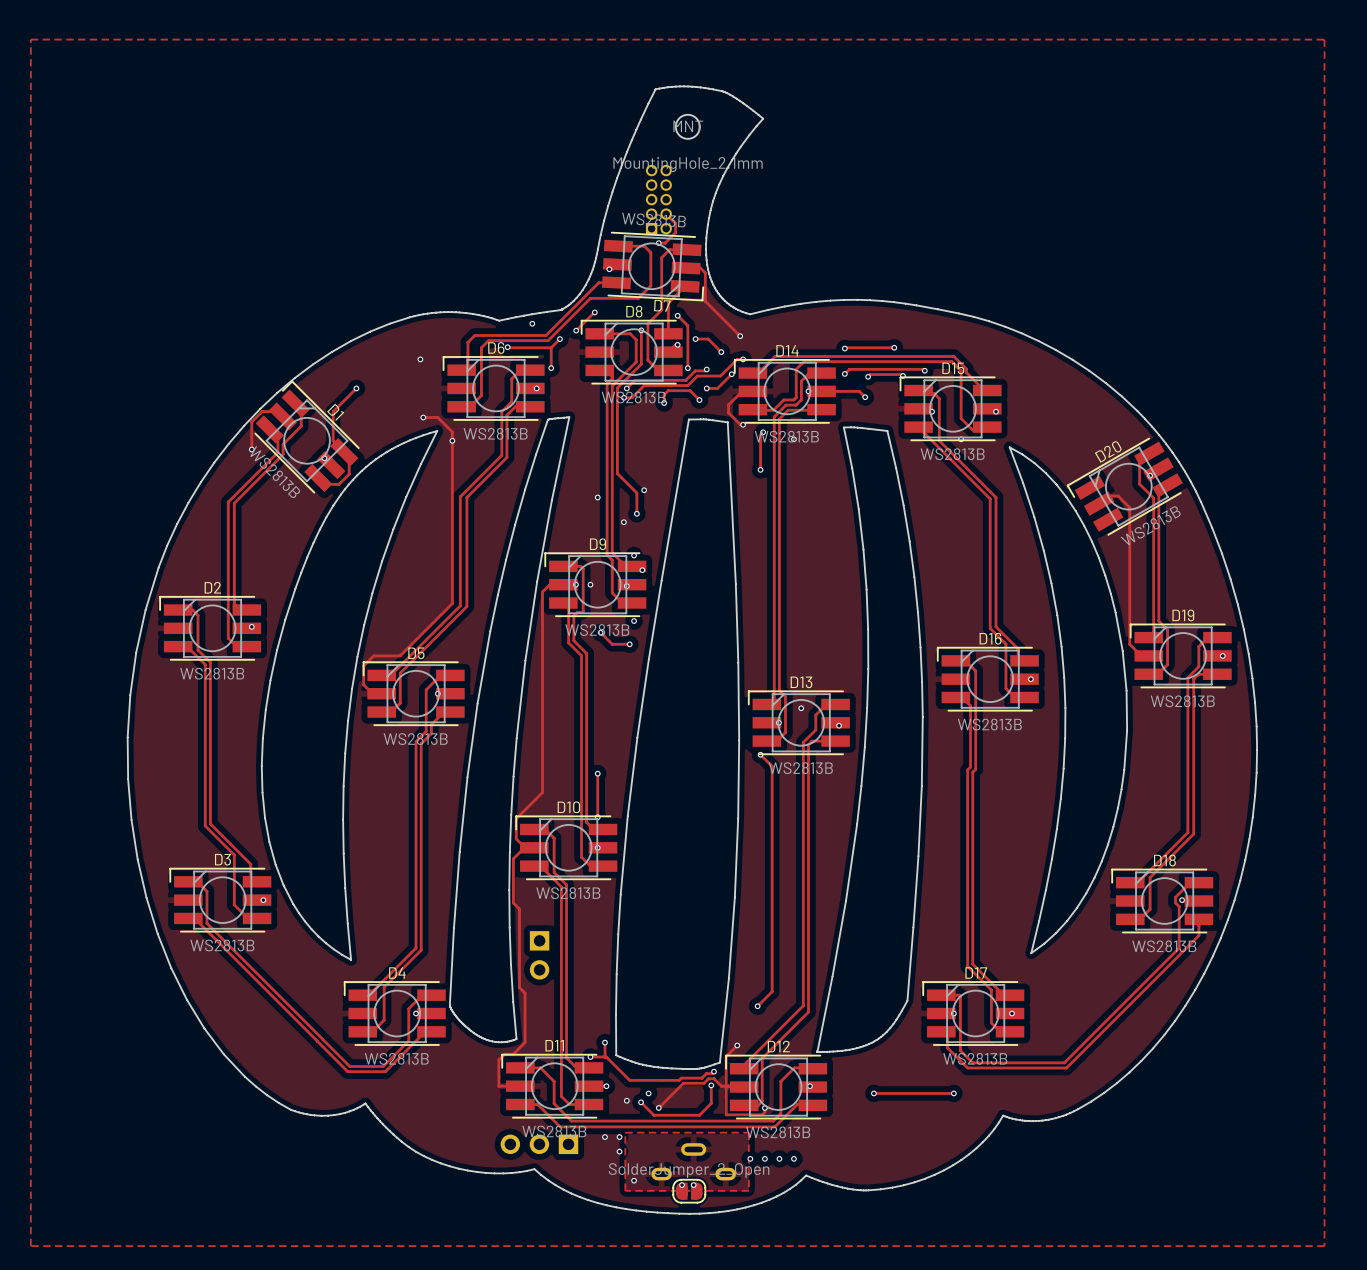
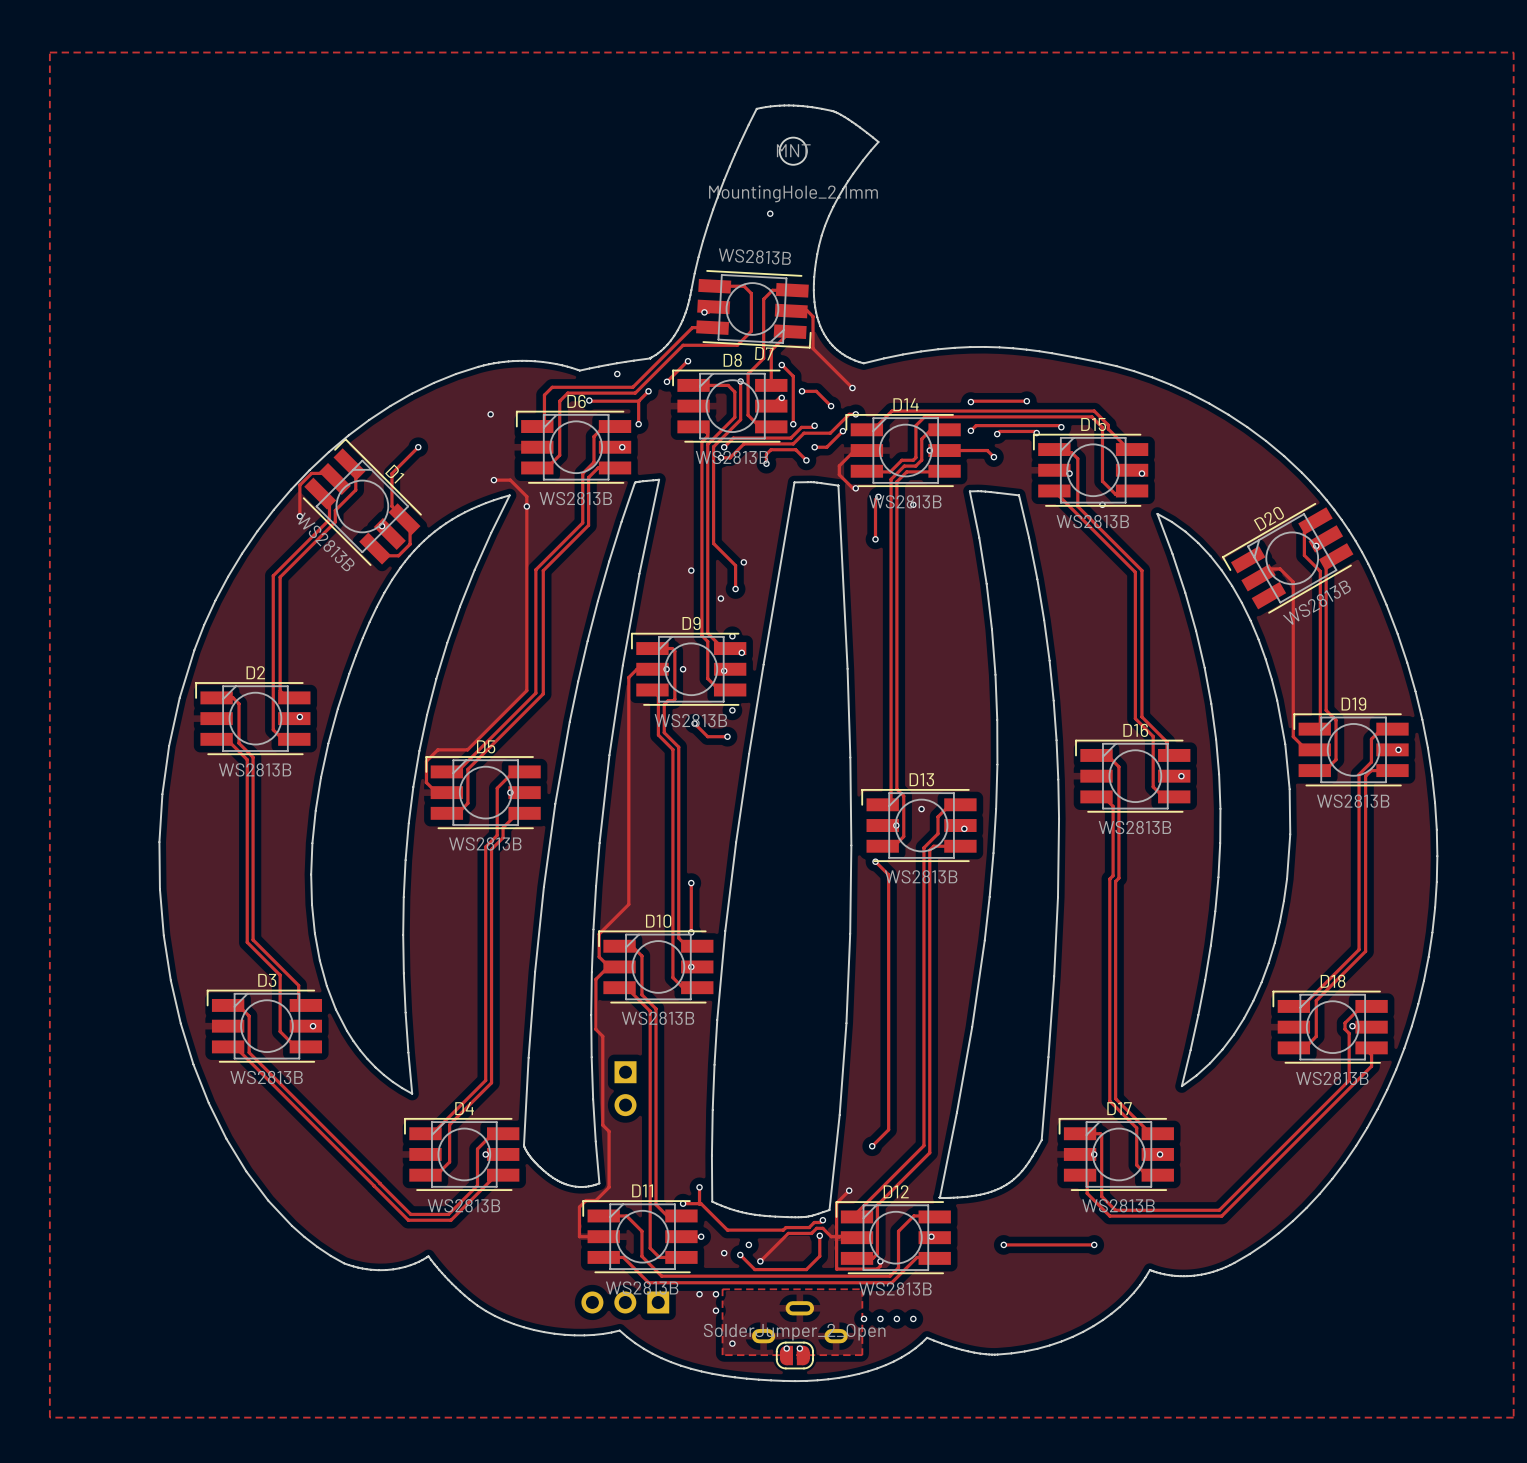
part: (658, 199) -> none
track: (666, 214) (675, 223) (675, 232) (665, 243) (658, 243) -> none
via position: (658, 243) -> (770, 213)

